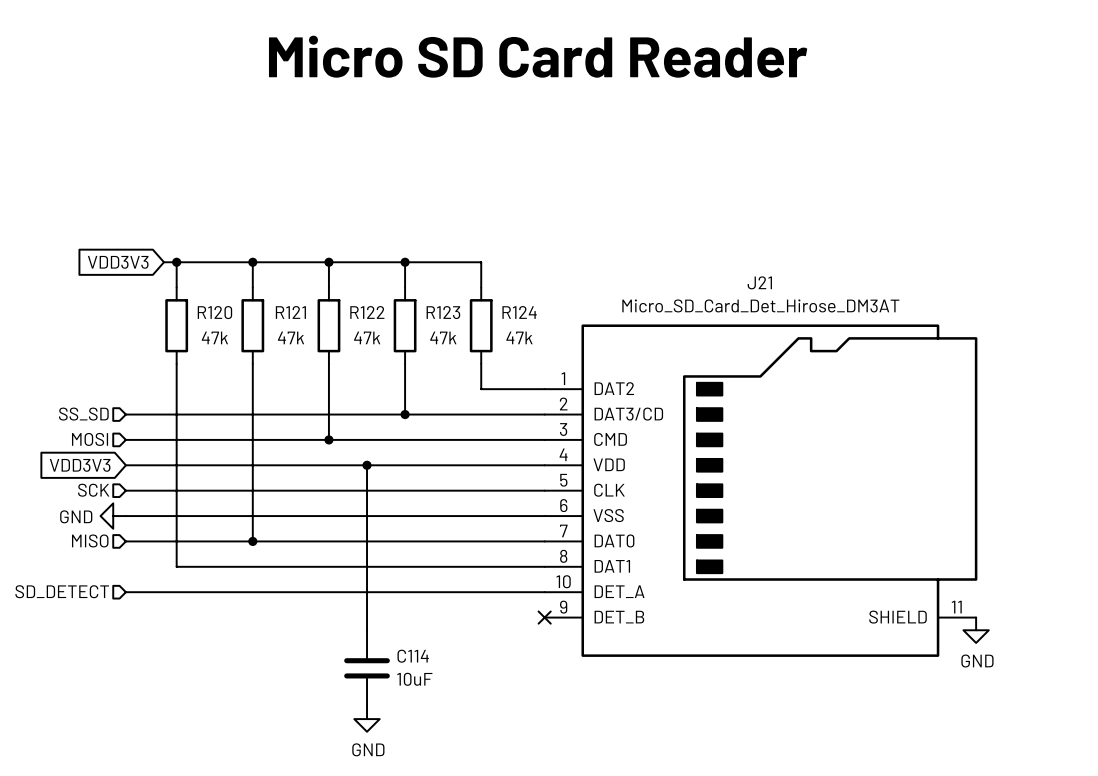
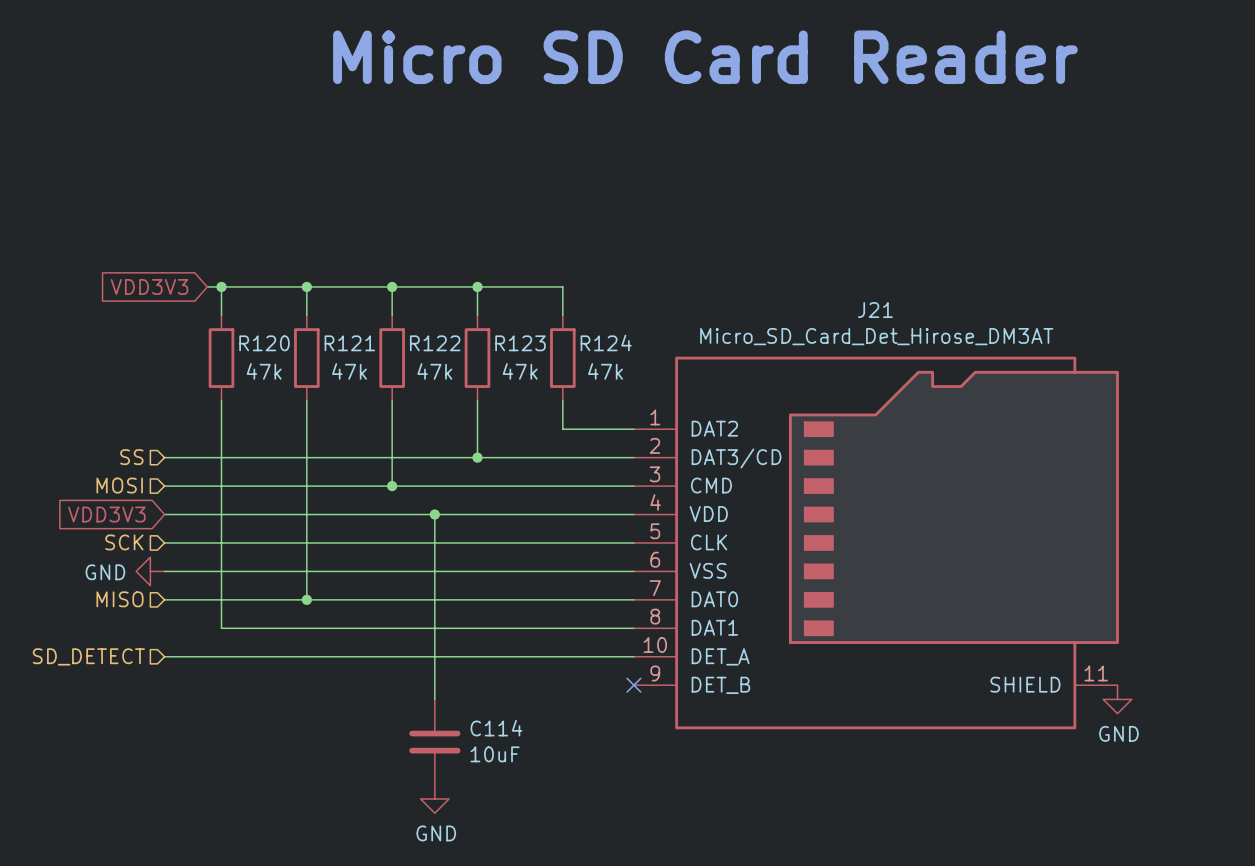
hierarchical label: SS_SD (83, 414) -> SS (131, 457)

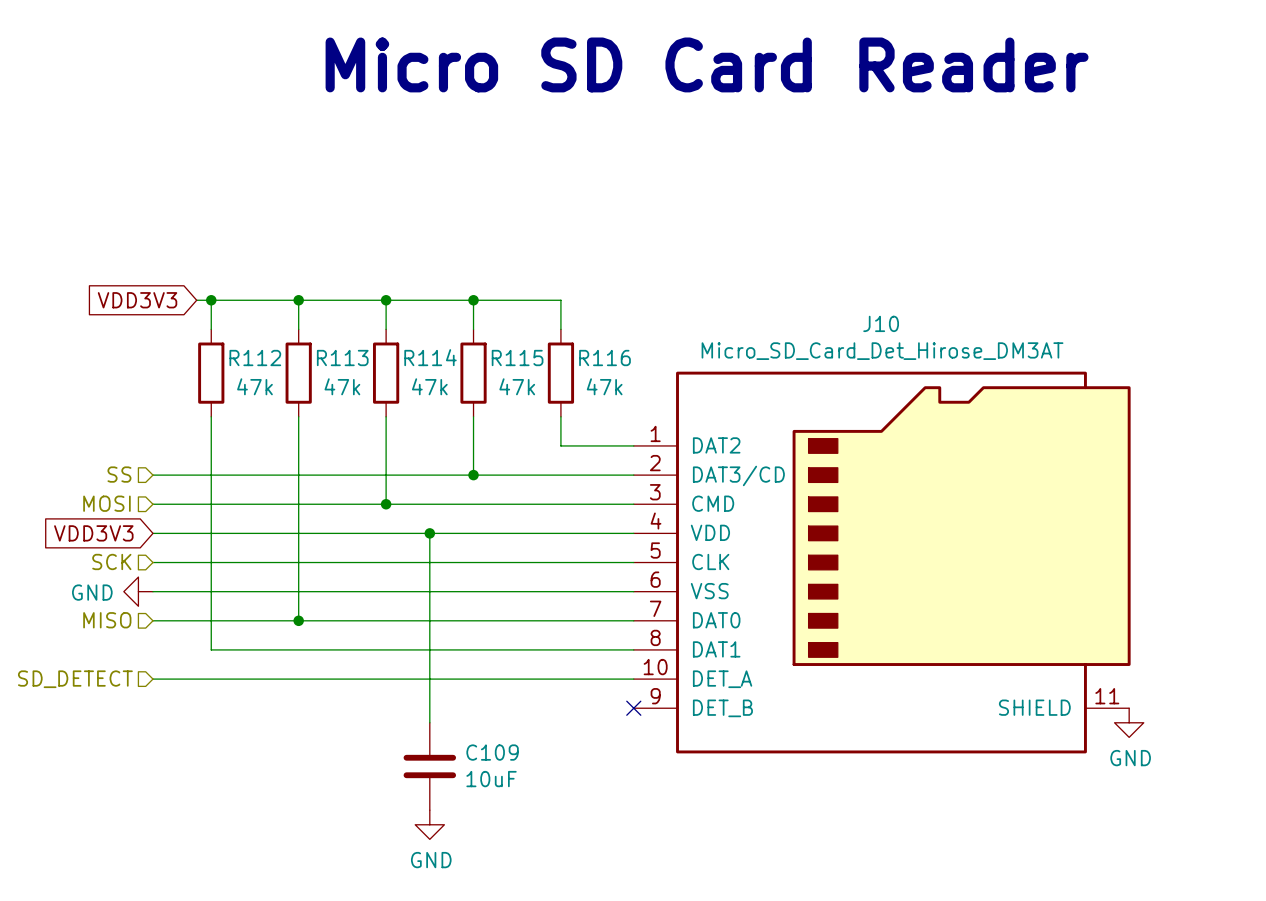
J21 name: J21 (875, 310) -> J10 (881, 323)
R124 name: R124 (606, 342) -> R116 (605, 358)
R120 name: R120 (264, 343) -> R112 (255, 358)
R121 name: R121 (349, 343) -> R113 (342, 358)
R122 name: R122 (435, 343) -> R114 (430, 357)
R123 name: R123 (520, 343) -> R115 (517, 358)
C114 name: C114 (496, 728) -> C109 (492, 752)

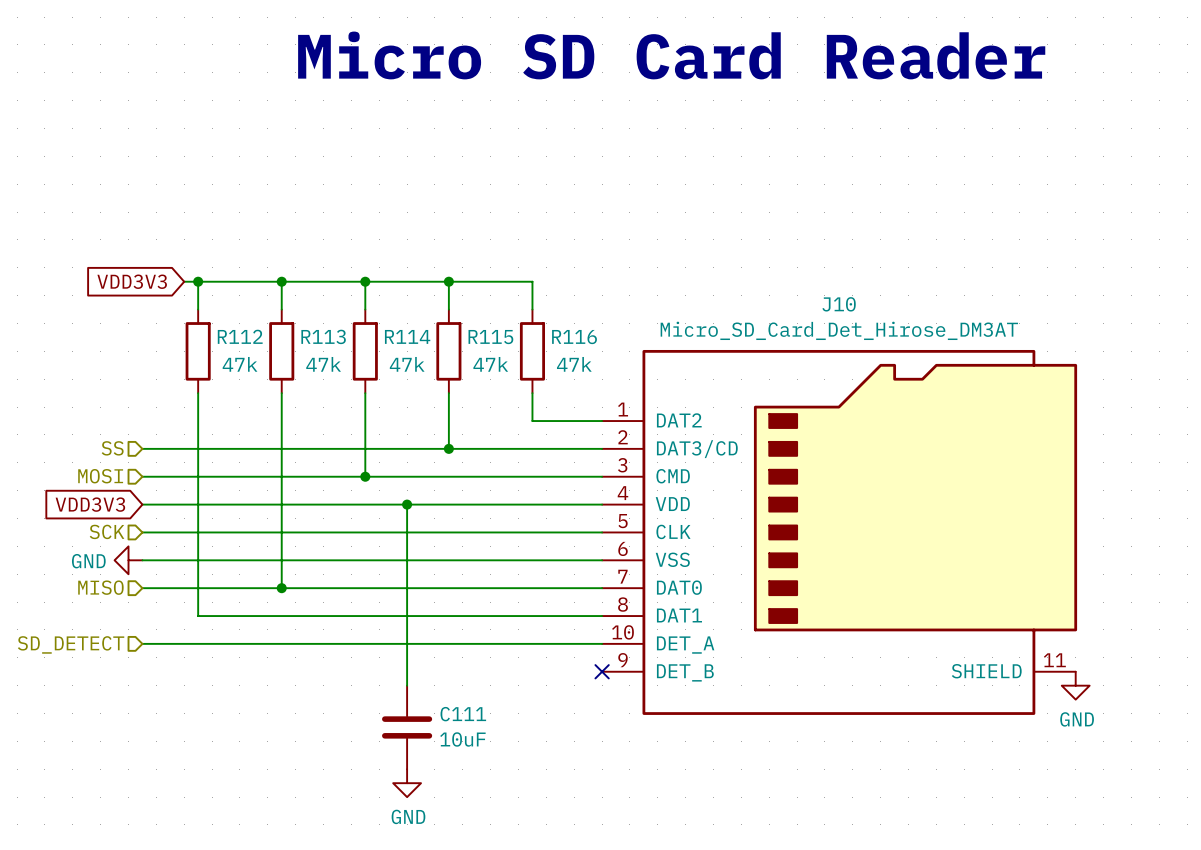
C109 name: C109 (492, 752) -> C111 (463, 714)

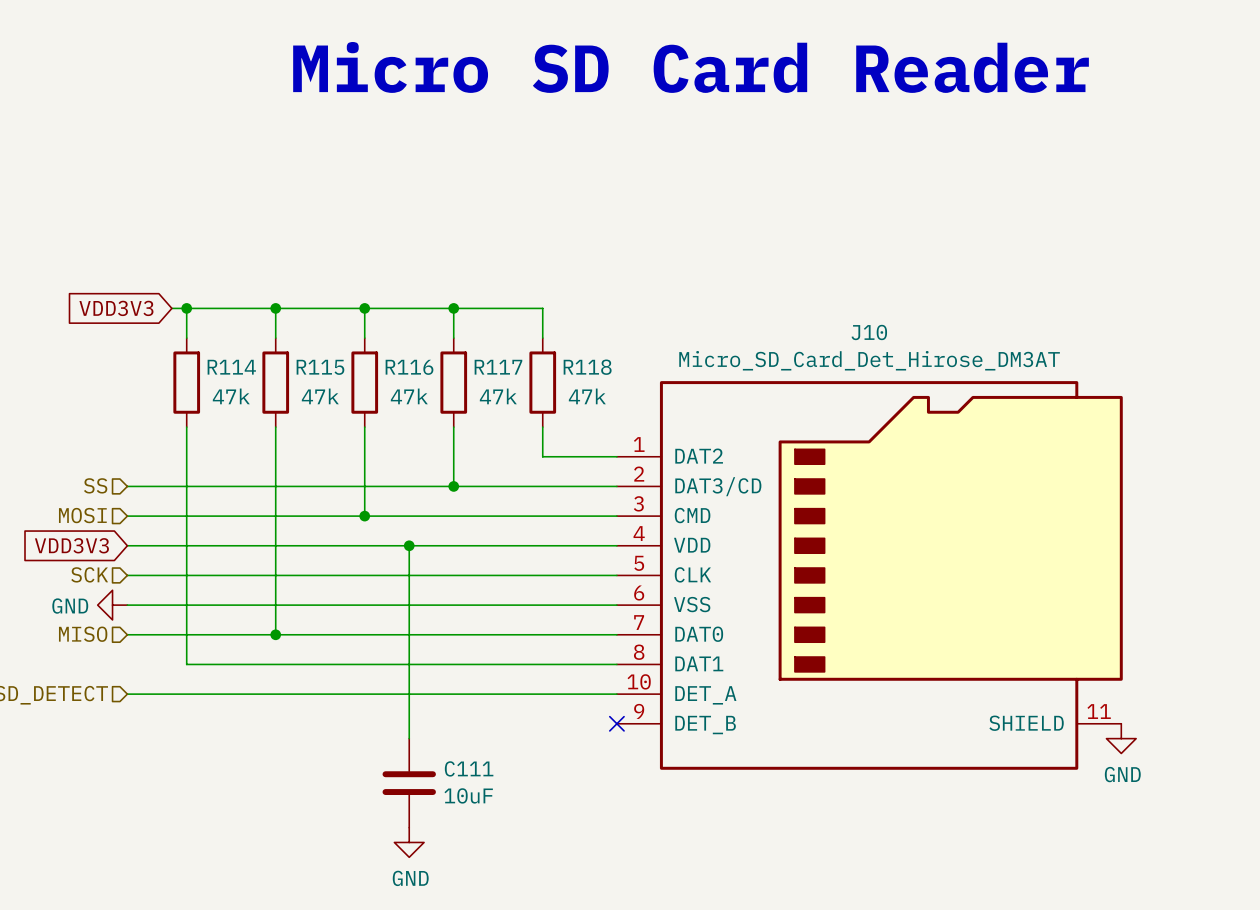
R112 name: R112 (240, 336) -> R114 (231, 367)
R113 name: R113 (323, 336) -> R115 (320, 367)
R114 name: R114 (407, 336) -> R116 (409, 367)
R115 name: R115 (490, 337) -> R117 (498, 367)
R116 name: R116 (574, 337) -> R118 (587, 367)

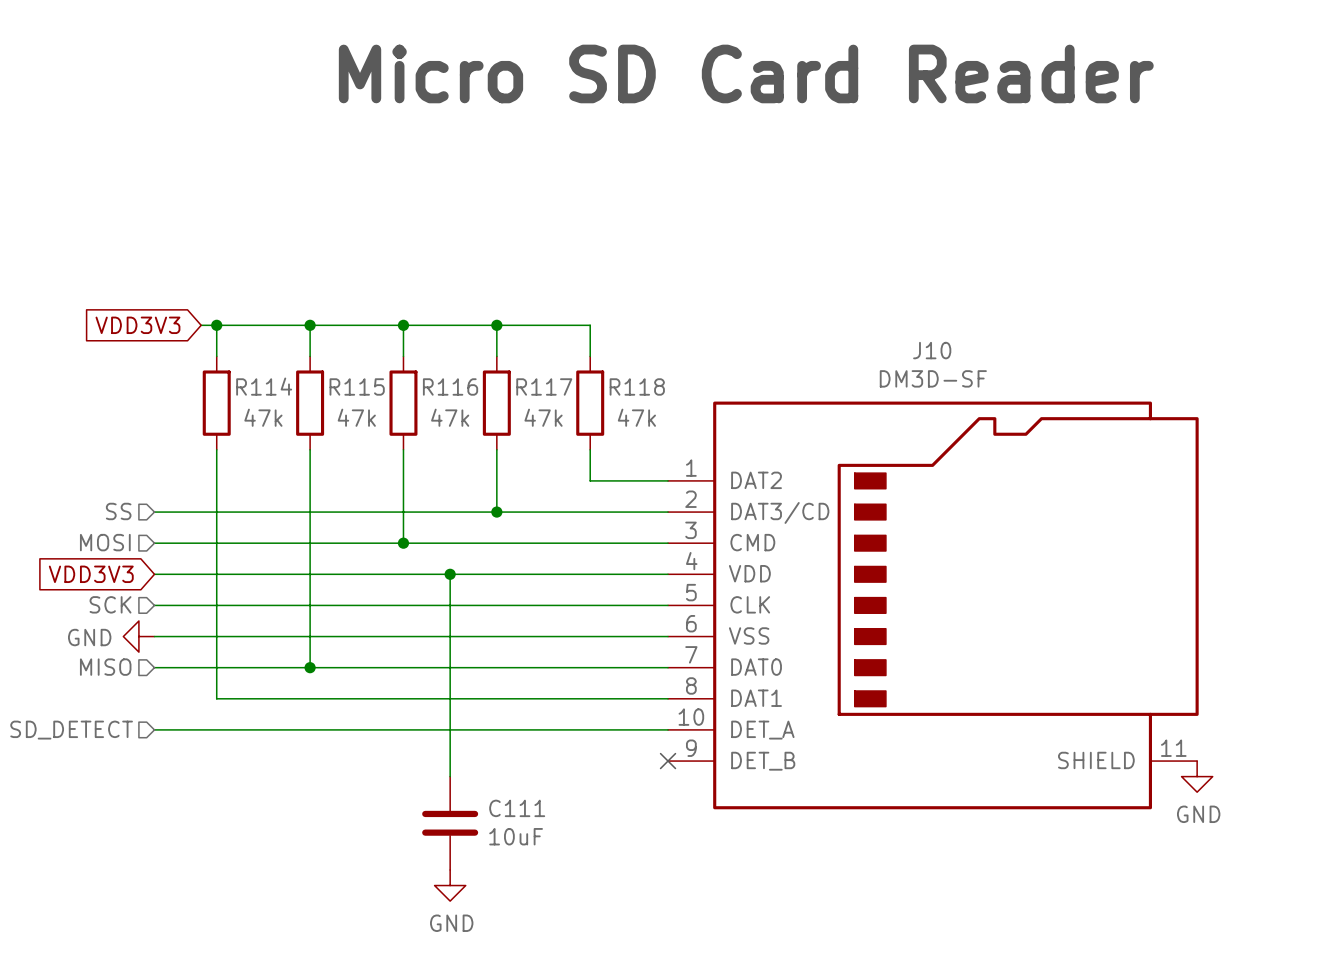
J10 value: Micro_SD_Card_Det_Hirose_DM3AT (869, 360) -> DM3D-SF (933, 378)

